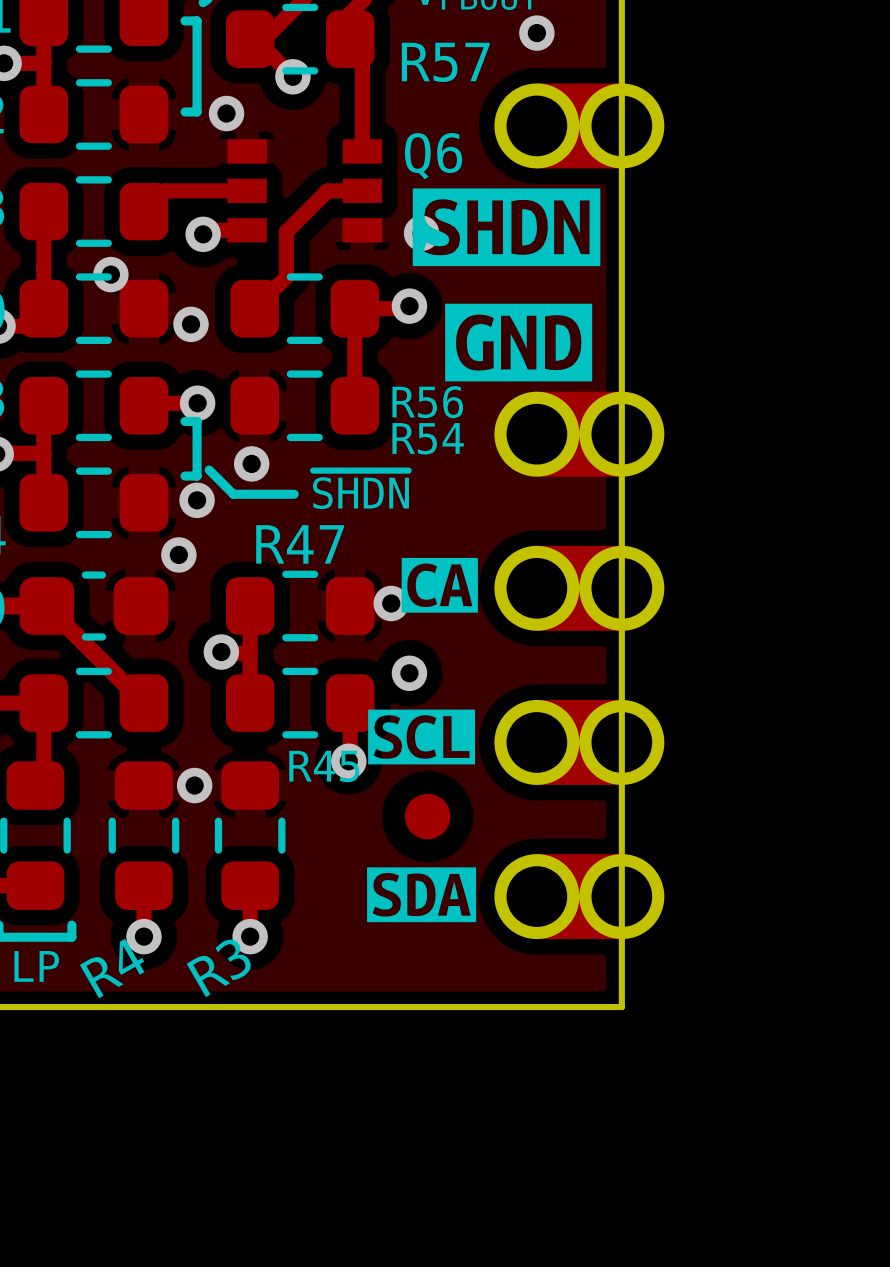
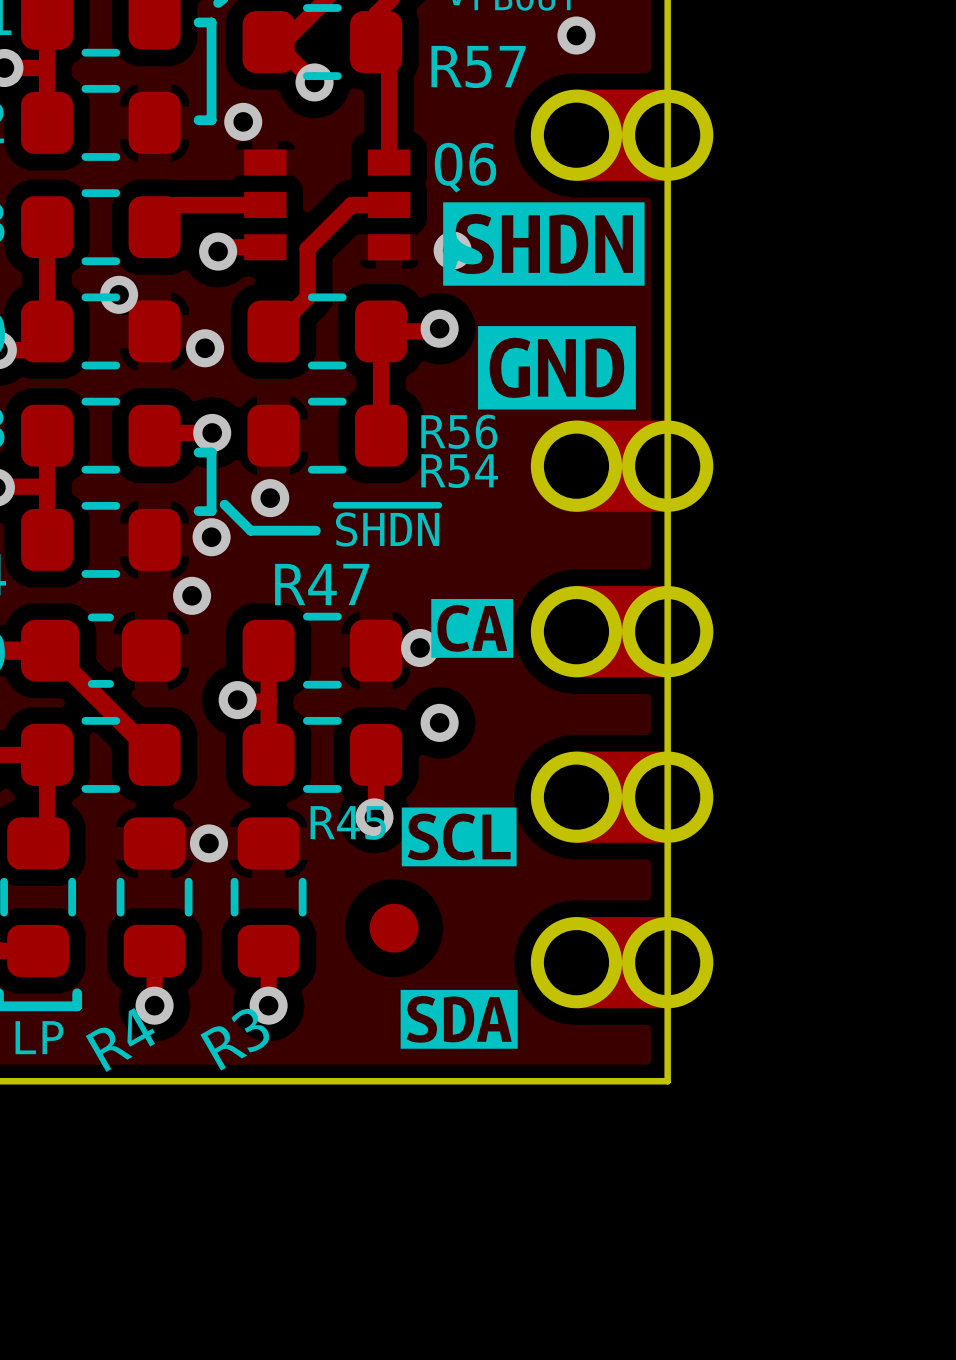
drawing position: (421, 736) -> (459, 836)
part position: (427, 816) -> (394, 928)
drawing position: (421, 894) -> (459, 1019)

